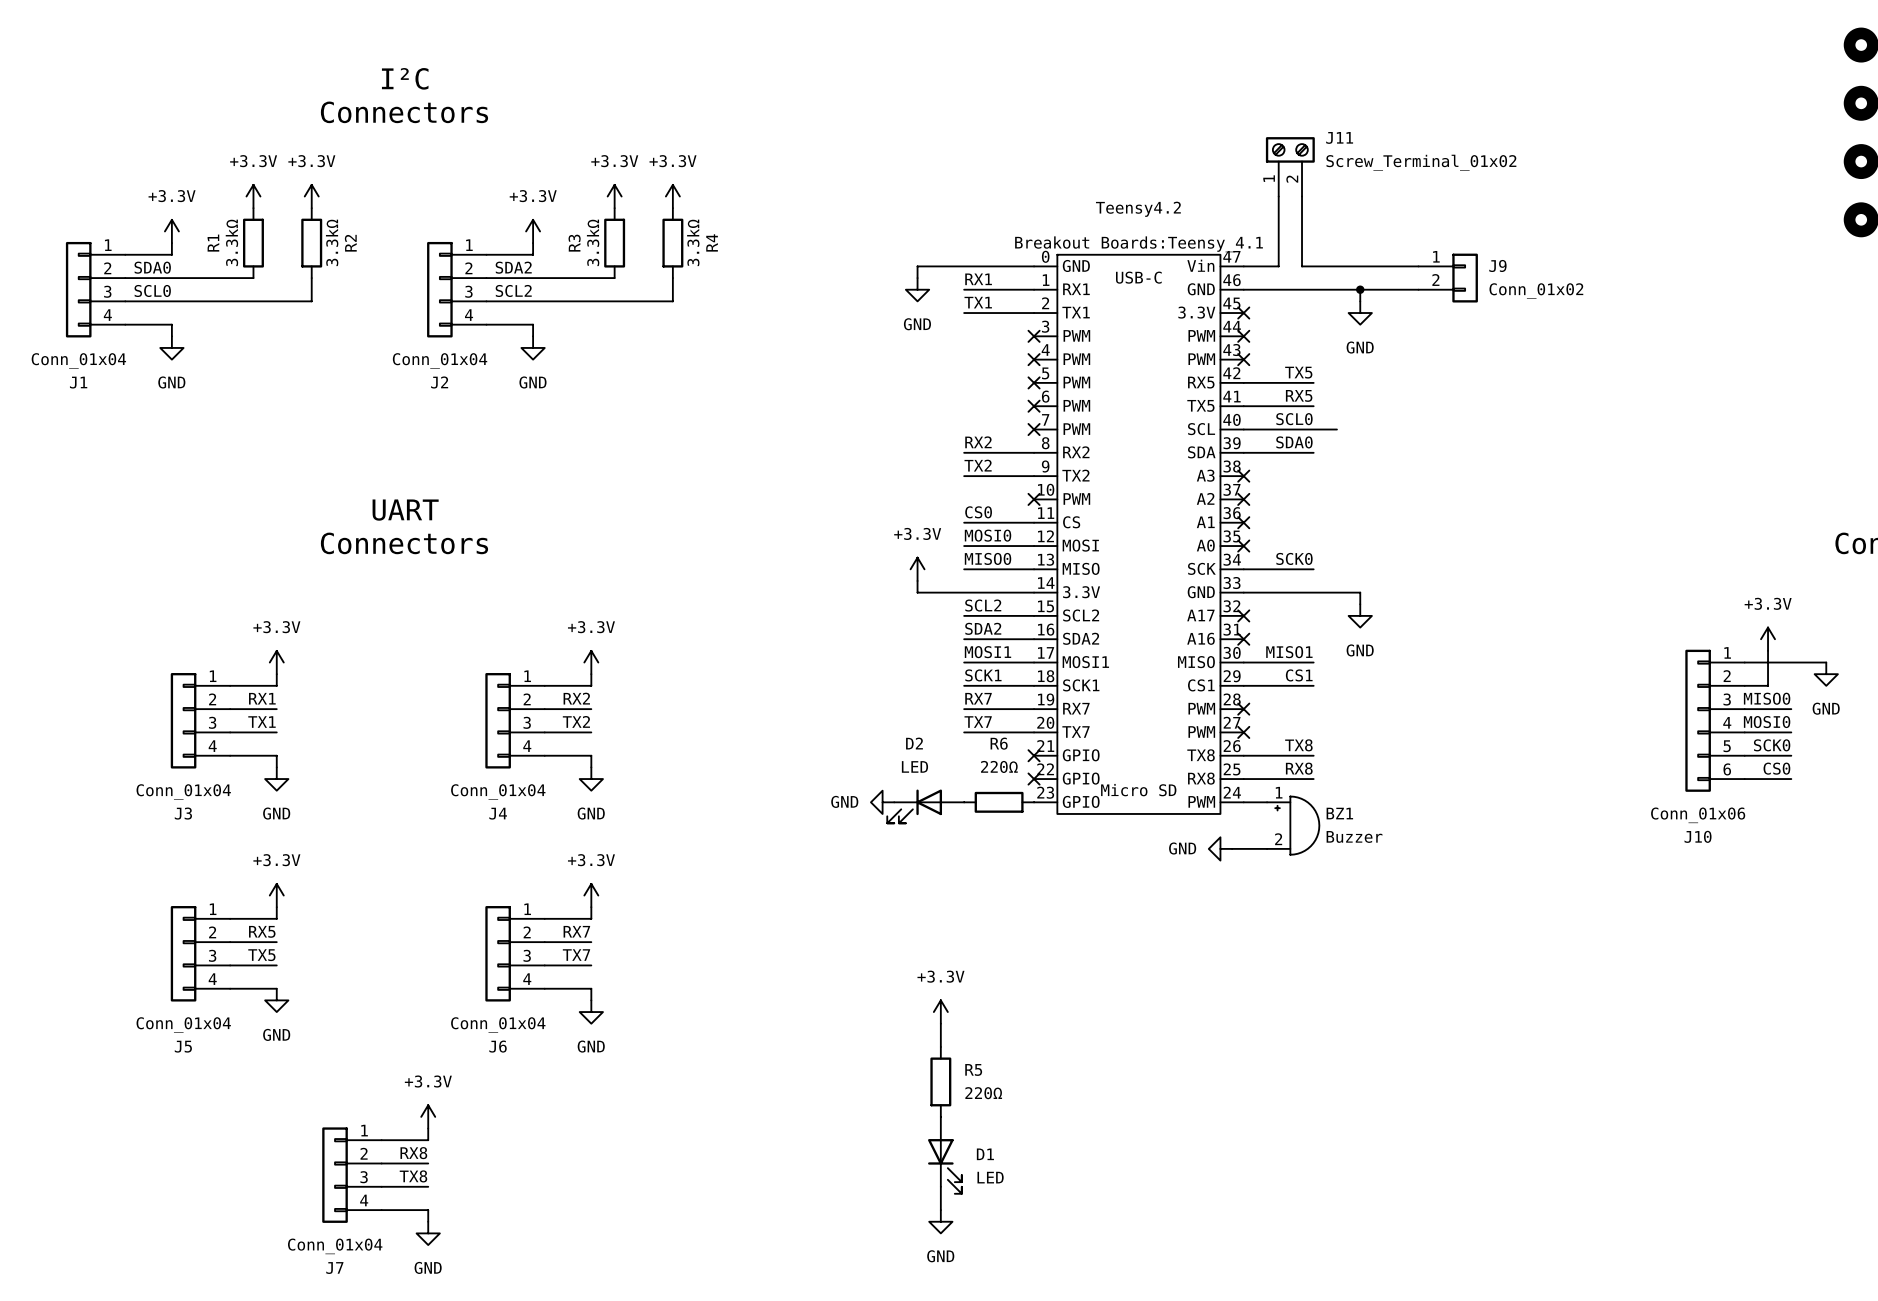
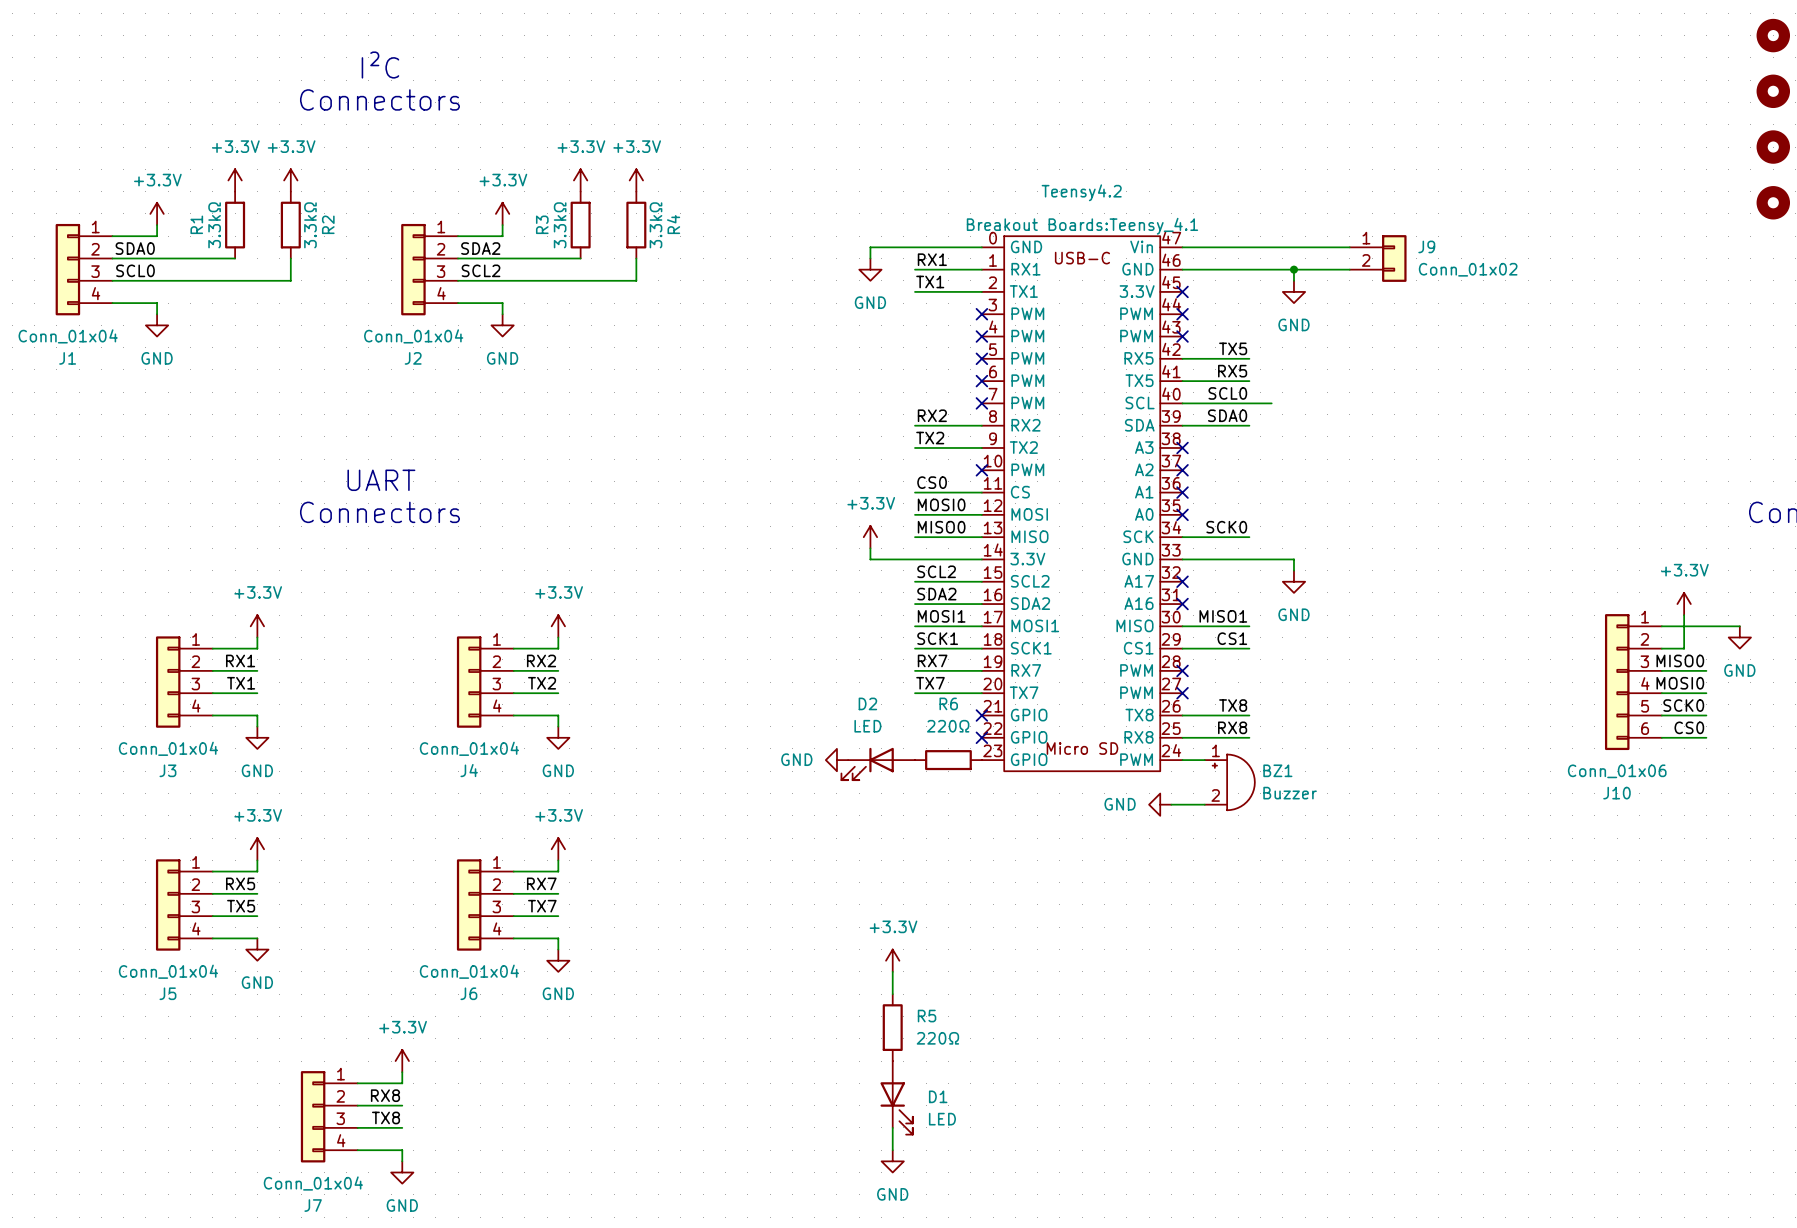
J11: Screw_Terminal_01x02 (1290, 166) -> none
wire: (1278, 196) (1278, 266) -> (1238, 247) (1215, 247)
wire: (1302, 196) (1302, 266) -> none

